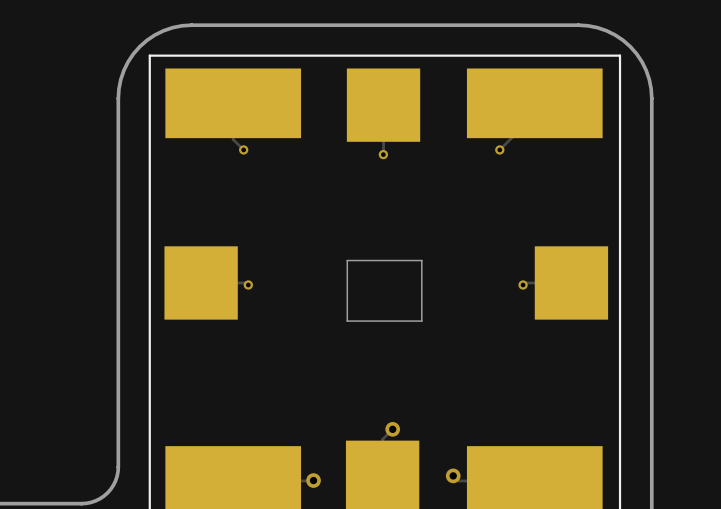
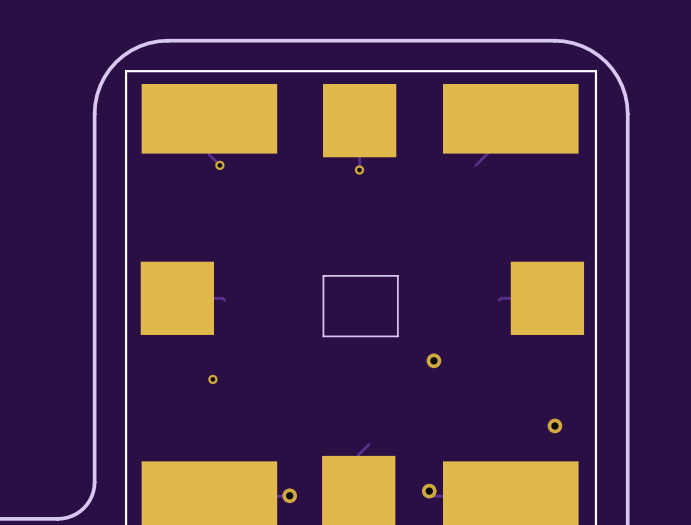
via: (499, 149) -> none
via position: (248, 284) -> (212, 379)
via: (523, 284) -> none
via: none -> (433, 360)
via: none -> (554, 425)
via: (392, 429) -> none

